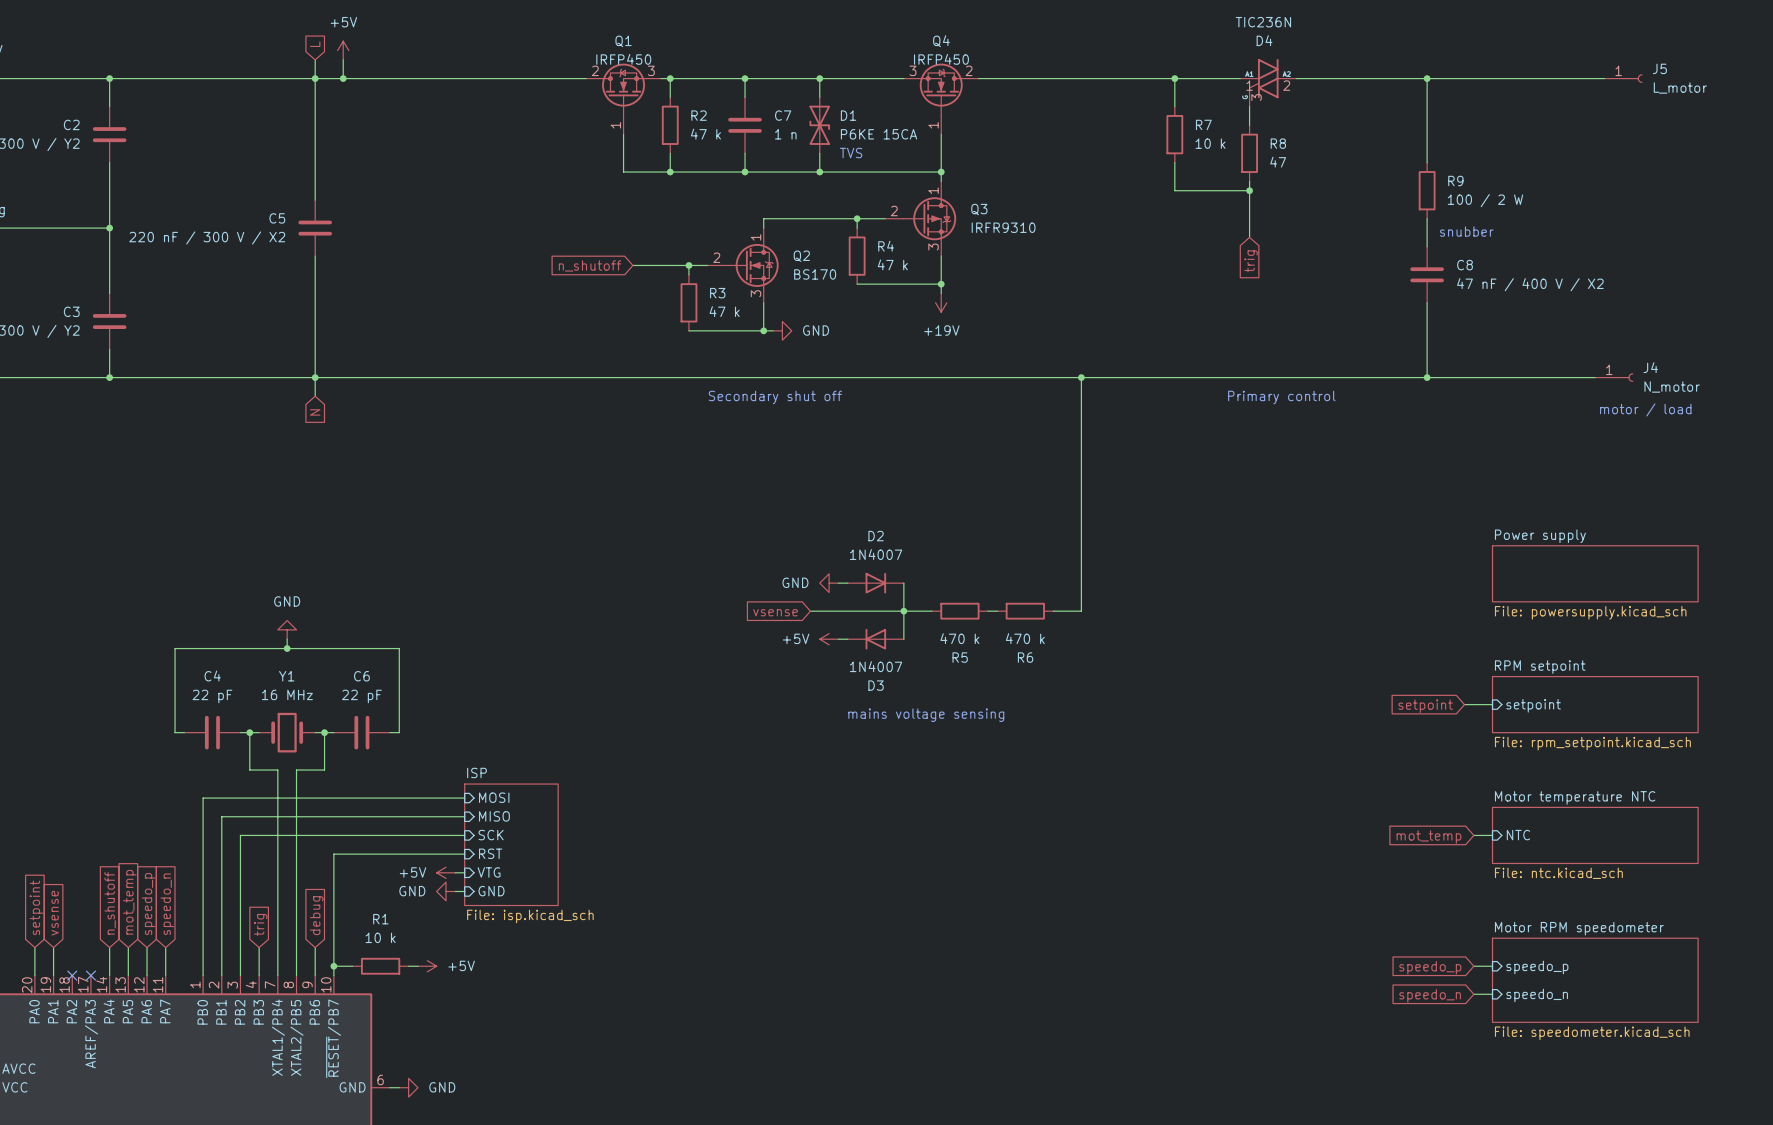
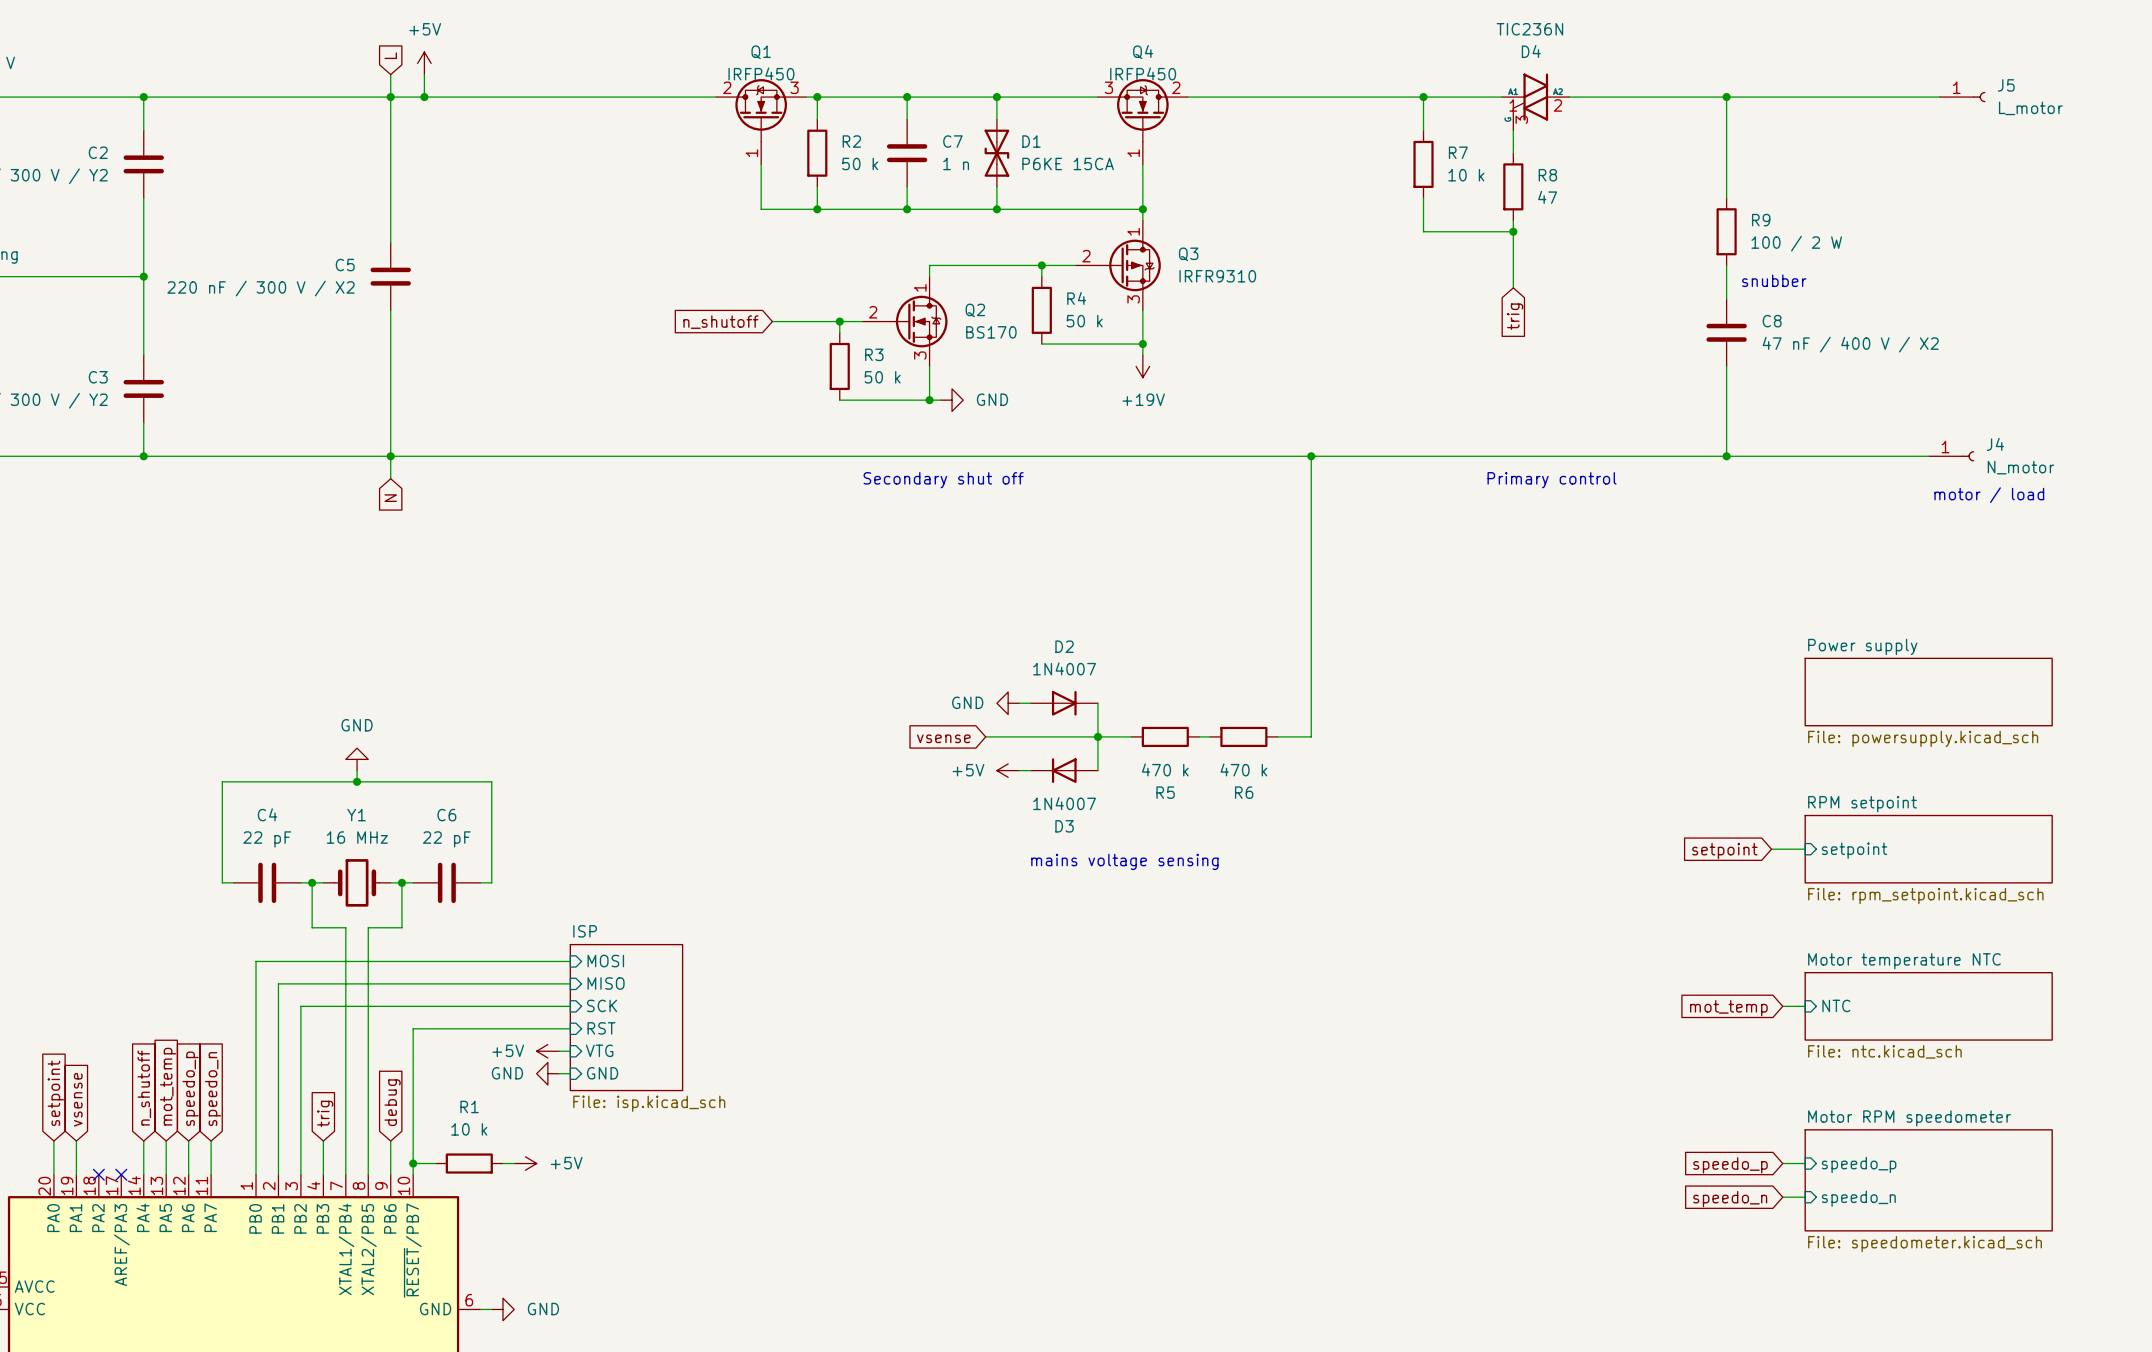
R2 value: 47 k (705, 134) -> 50 k (860, 163)
text: TVS (851, 153) -> none
R4 value: 47 k (892, 264) -> 50 k (1084, 321)
R3 value: 47 k (724, 311) -> 50 k (882, 377)

